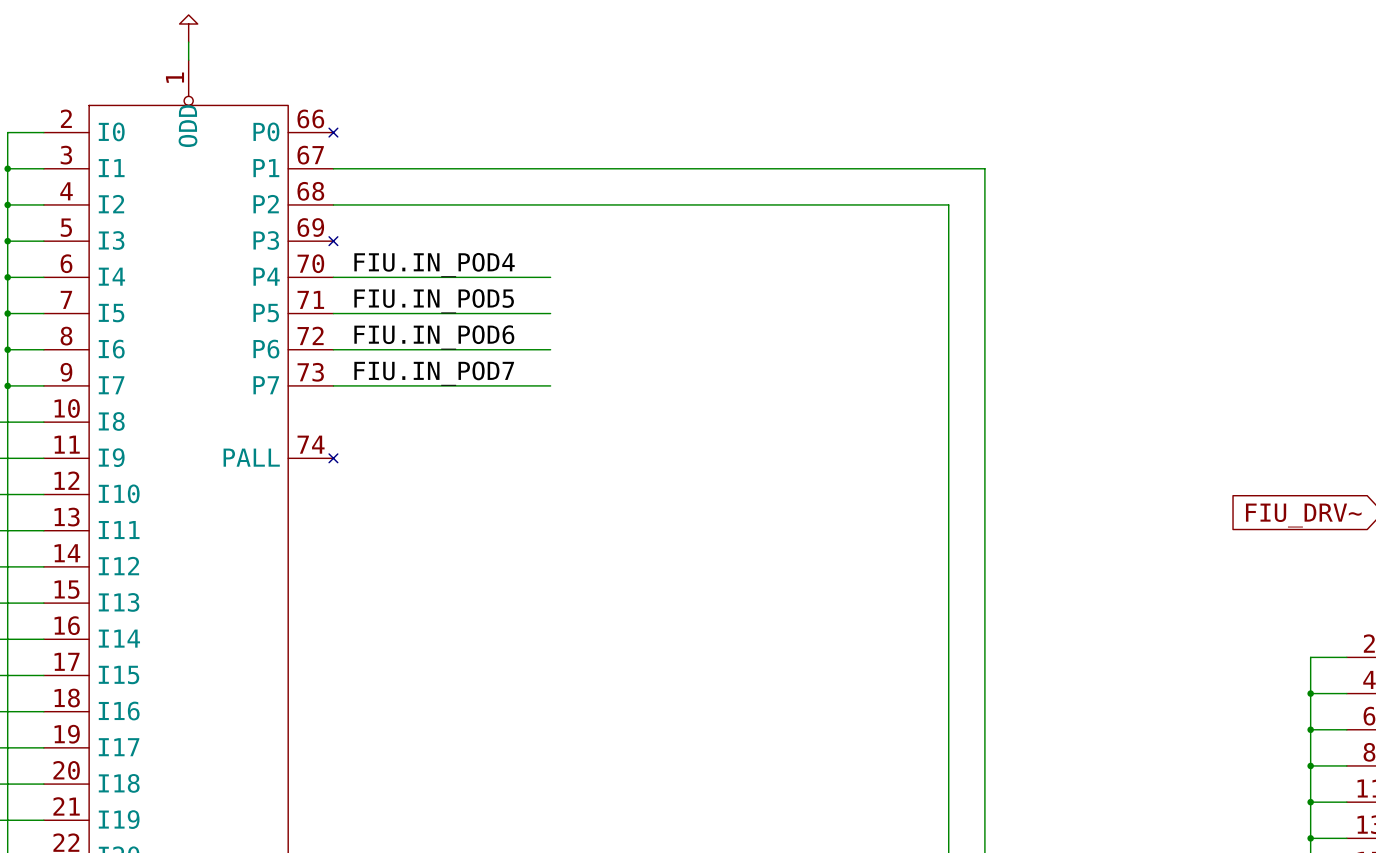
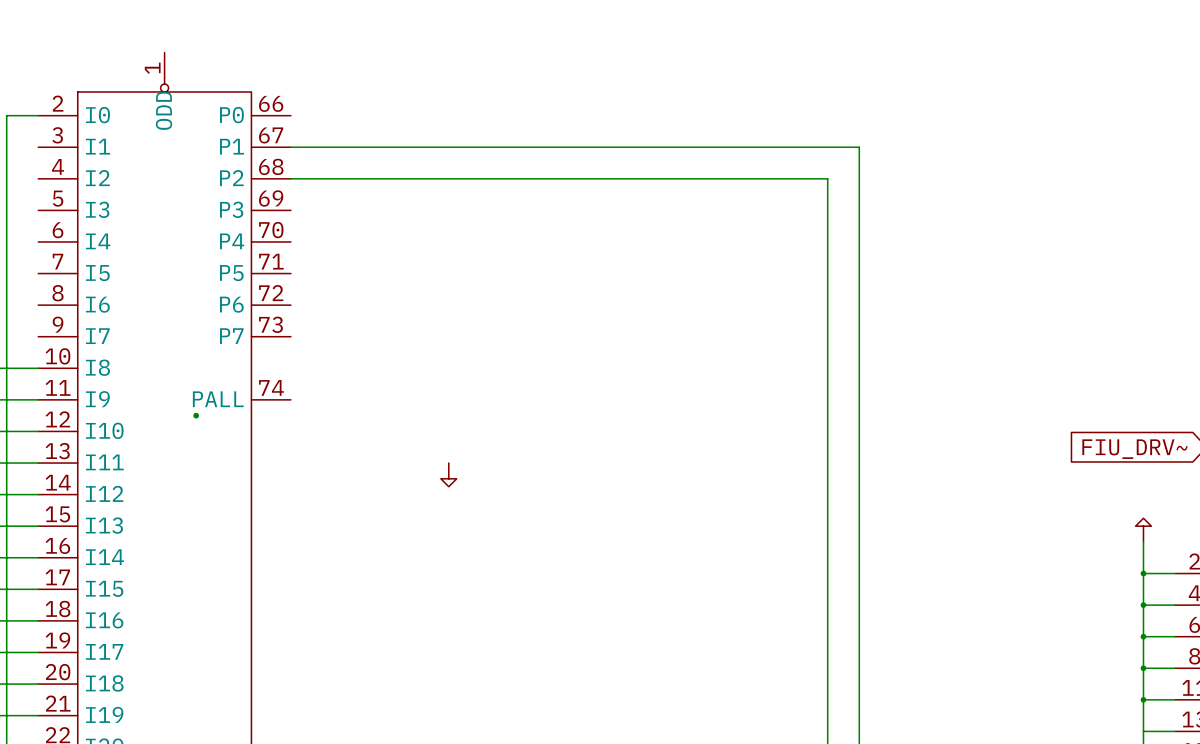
power symbol: (188, 28) -> none
wire: (188, 42) (188, 60) -> none
no-connect mark: (333, 132) -> none
wire: (7, 168) (43, 168) -> none
junction: (7, 168) -> none
wire: (7, 204) (43, 204) -> none
junction: (7, 204) -> none
wire: (7, 241) (43, 241) -> none
junction: (7, 241) -> none
no-connect mark: (333, 241) -> none
label: FIU.IN_POD4 (434, 265) -> none
wire: (7, 277) (43, 277) -> none
junction: (7, 277) -> none
wire: (333, 277) (550, 277) -> none
label: FIU.IN_POD5 (434, 301) -> none
wire: (7, 313) (43, 313) -> none
junction: (7, 313) -> none
wire: (333, 313) (550, 313) -> none
label: FIU.IN_POD6 (434, 337) -> none
wire: (7, 349) (43, 349) -> none
junction: (7, 349) -> none
wire: (333, 349) (550, 349) -> none
label: FIU.IN_POD7 (434, 373) -> none
wire: (7, 385) (43, 385) -> none
junction: (7, 385) -> none
wire: (333, 385) (550, 385) -> none
no-connect mark: (333, 458) -> none
junction: none -> (196, 415)
power symbol: none -> (448, 475)
power symbol: none -> (1143, 529)
wire: none -> (1143, 541) (1143, 573)
junction: none -> (1143, 573)
junction: (1310, 838) -> none

